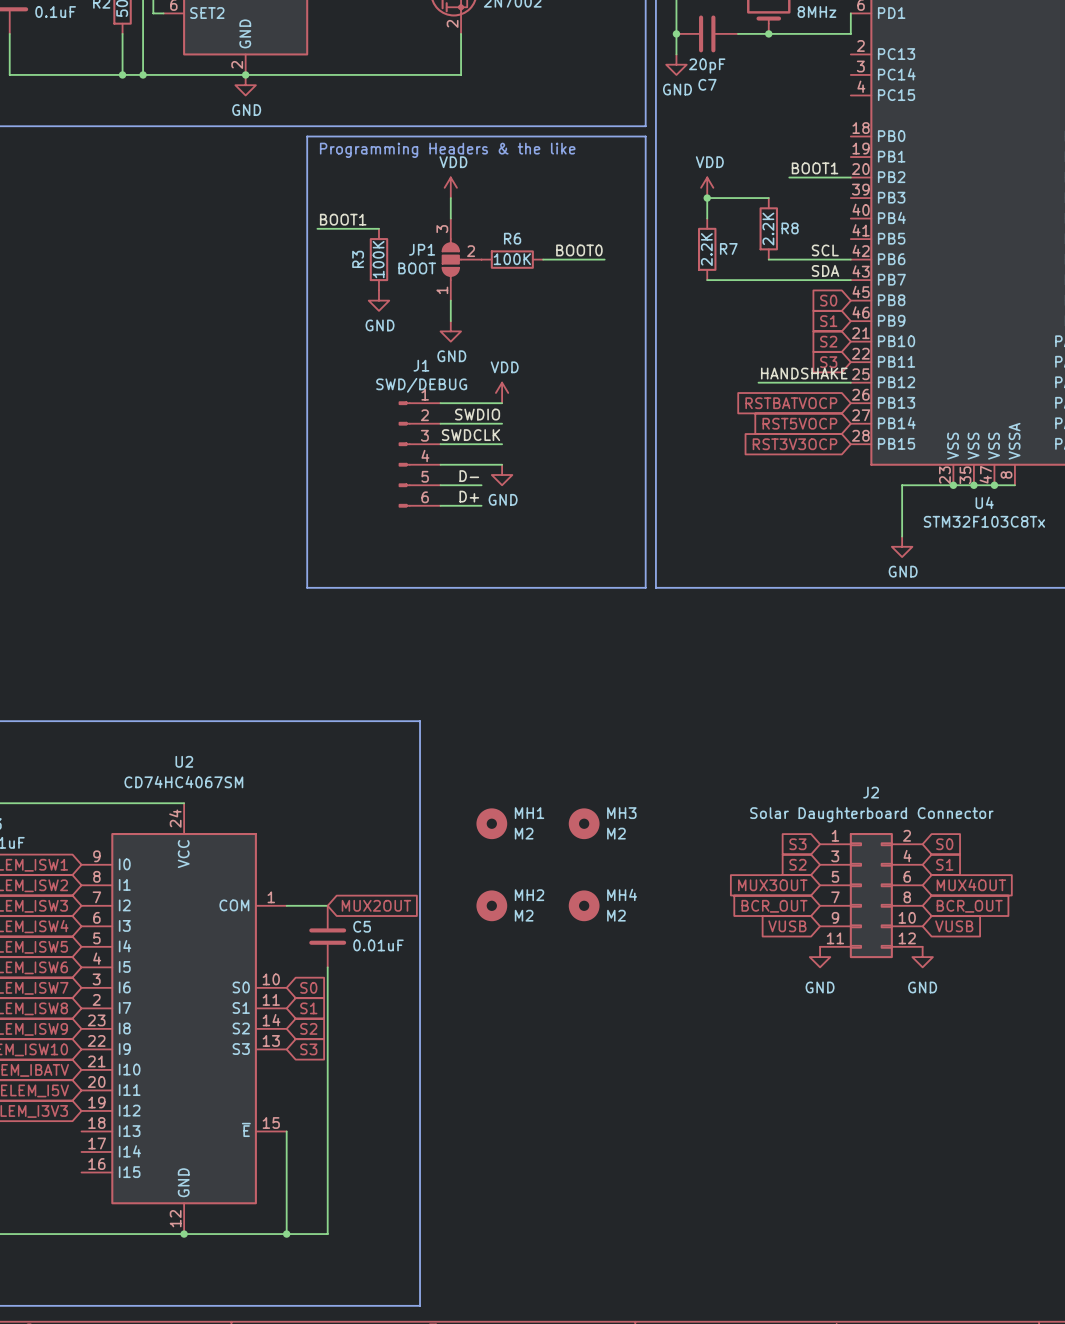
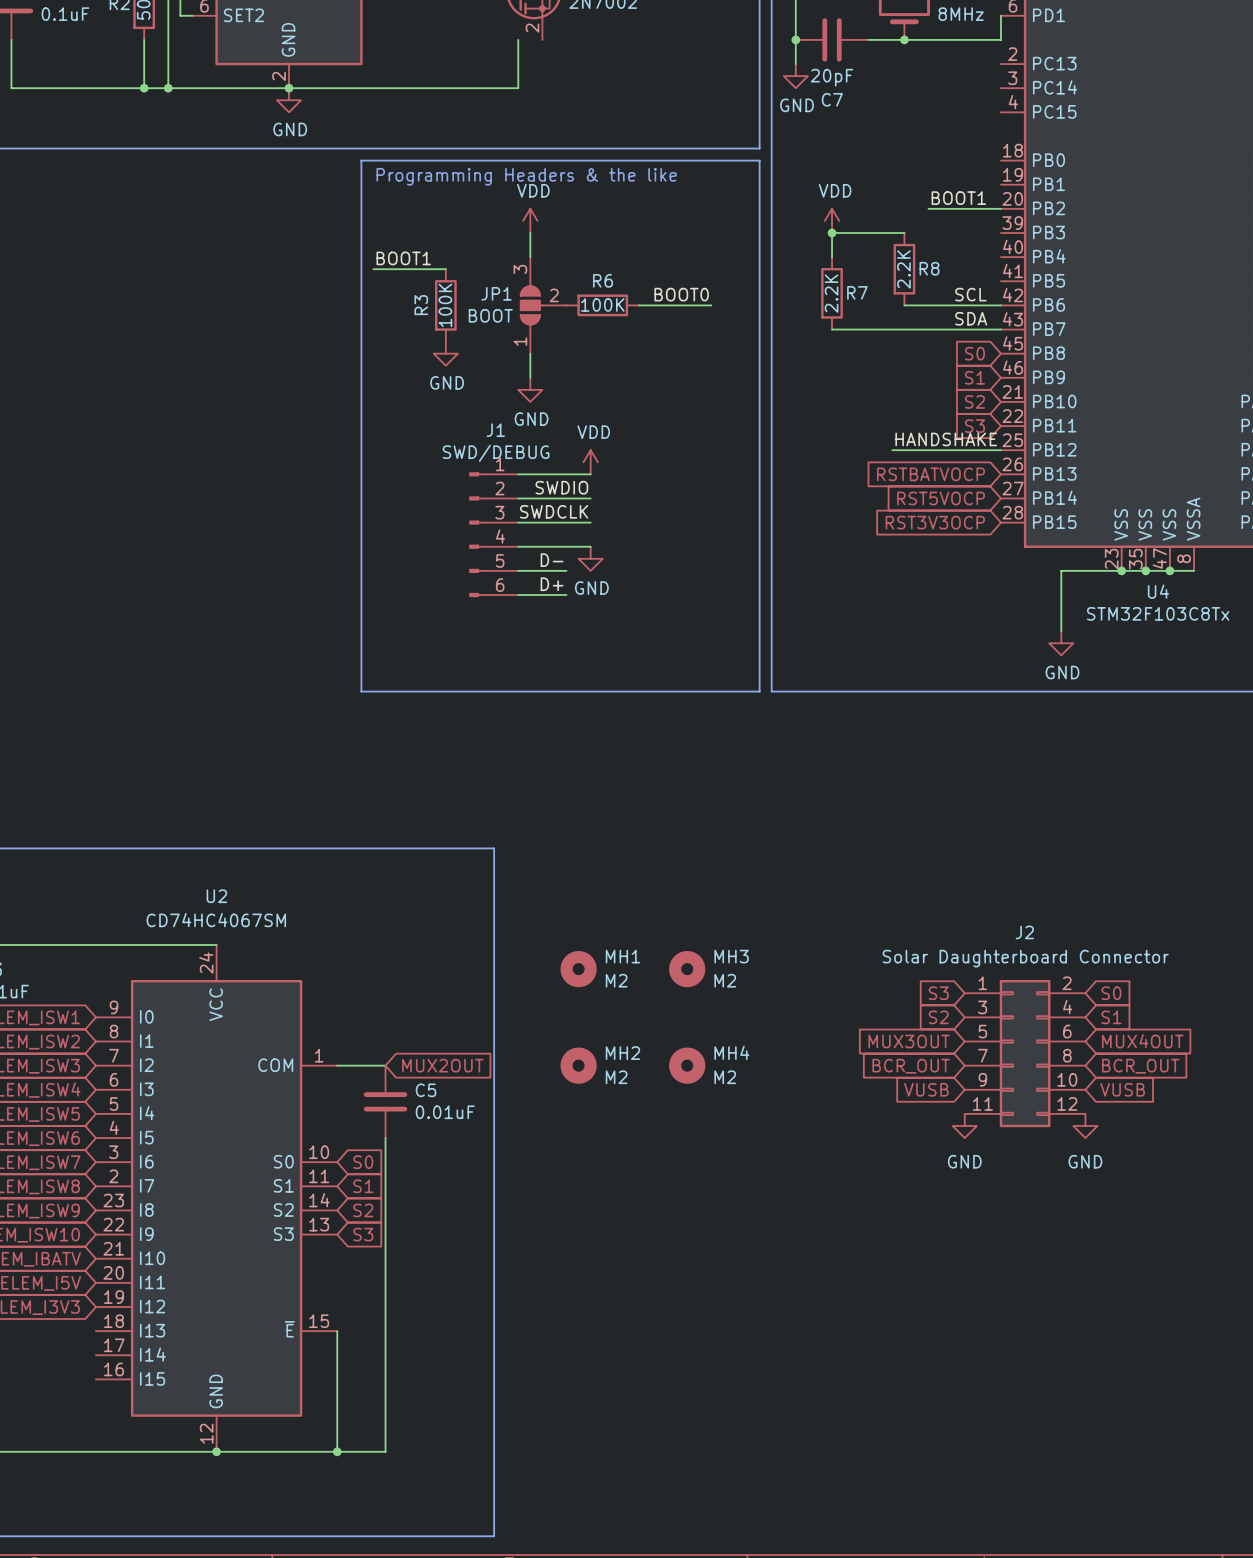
wire: (461, 33) (461, 74) (440, 74) -> (518, 39) (518, 88)

